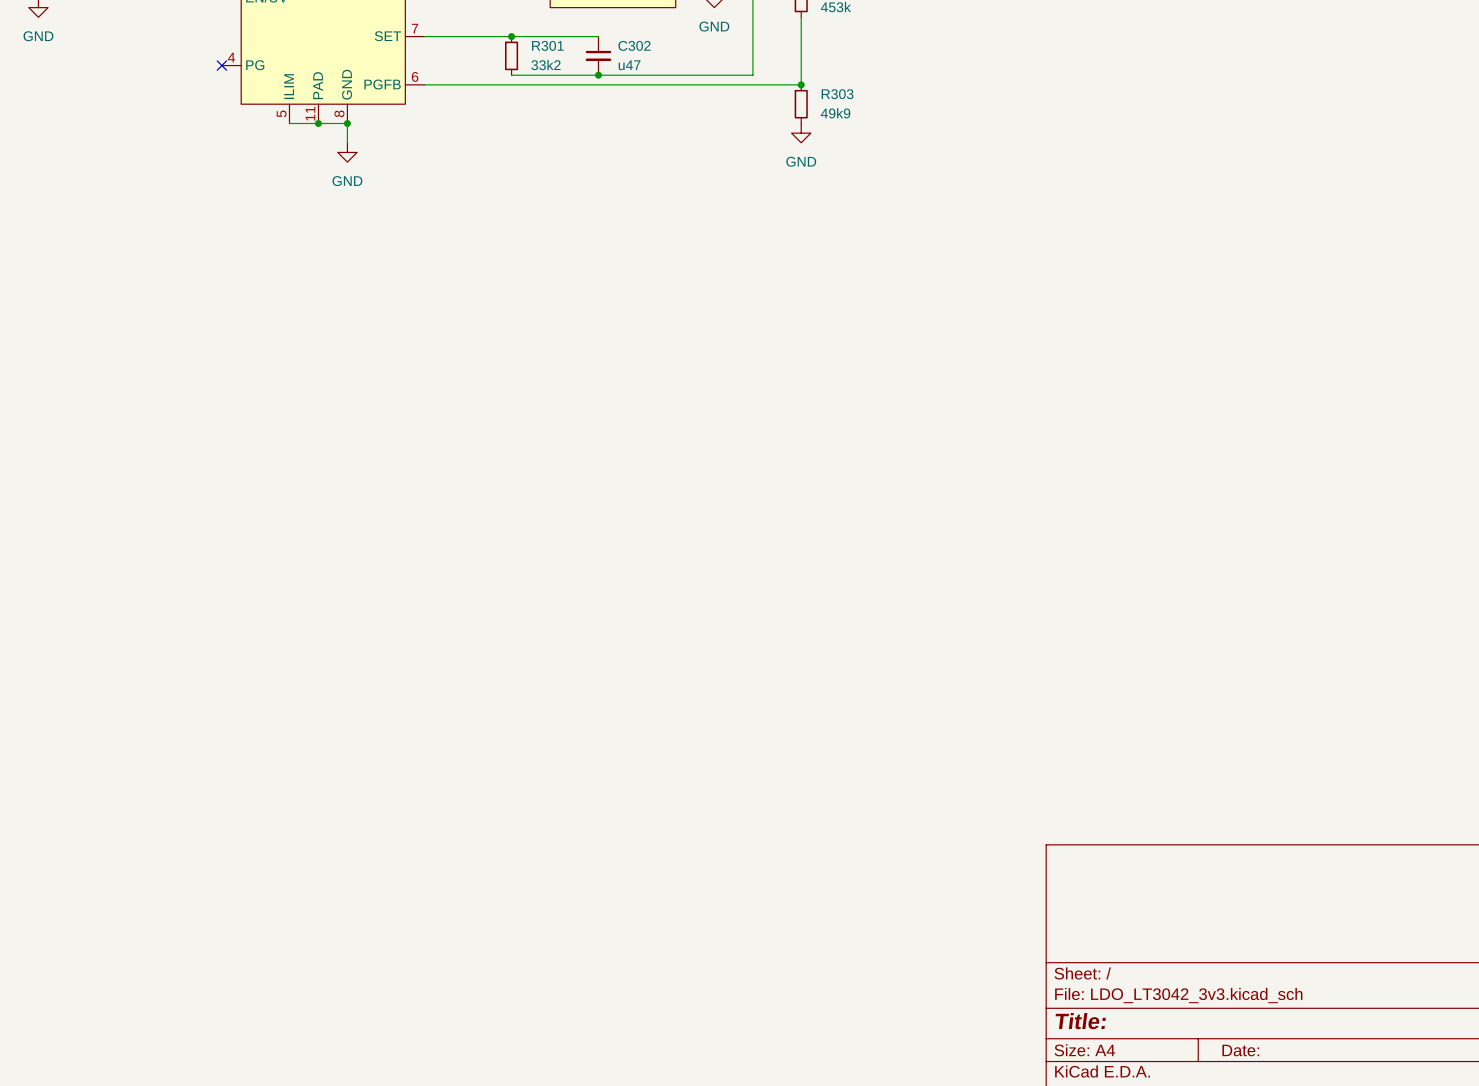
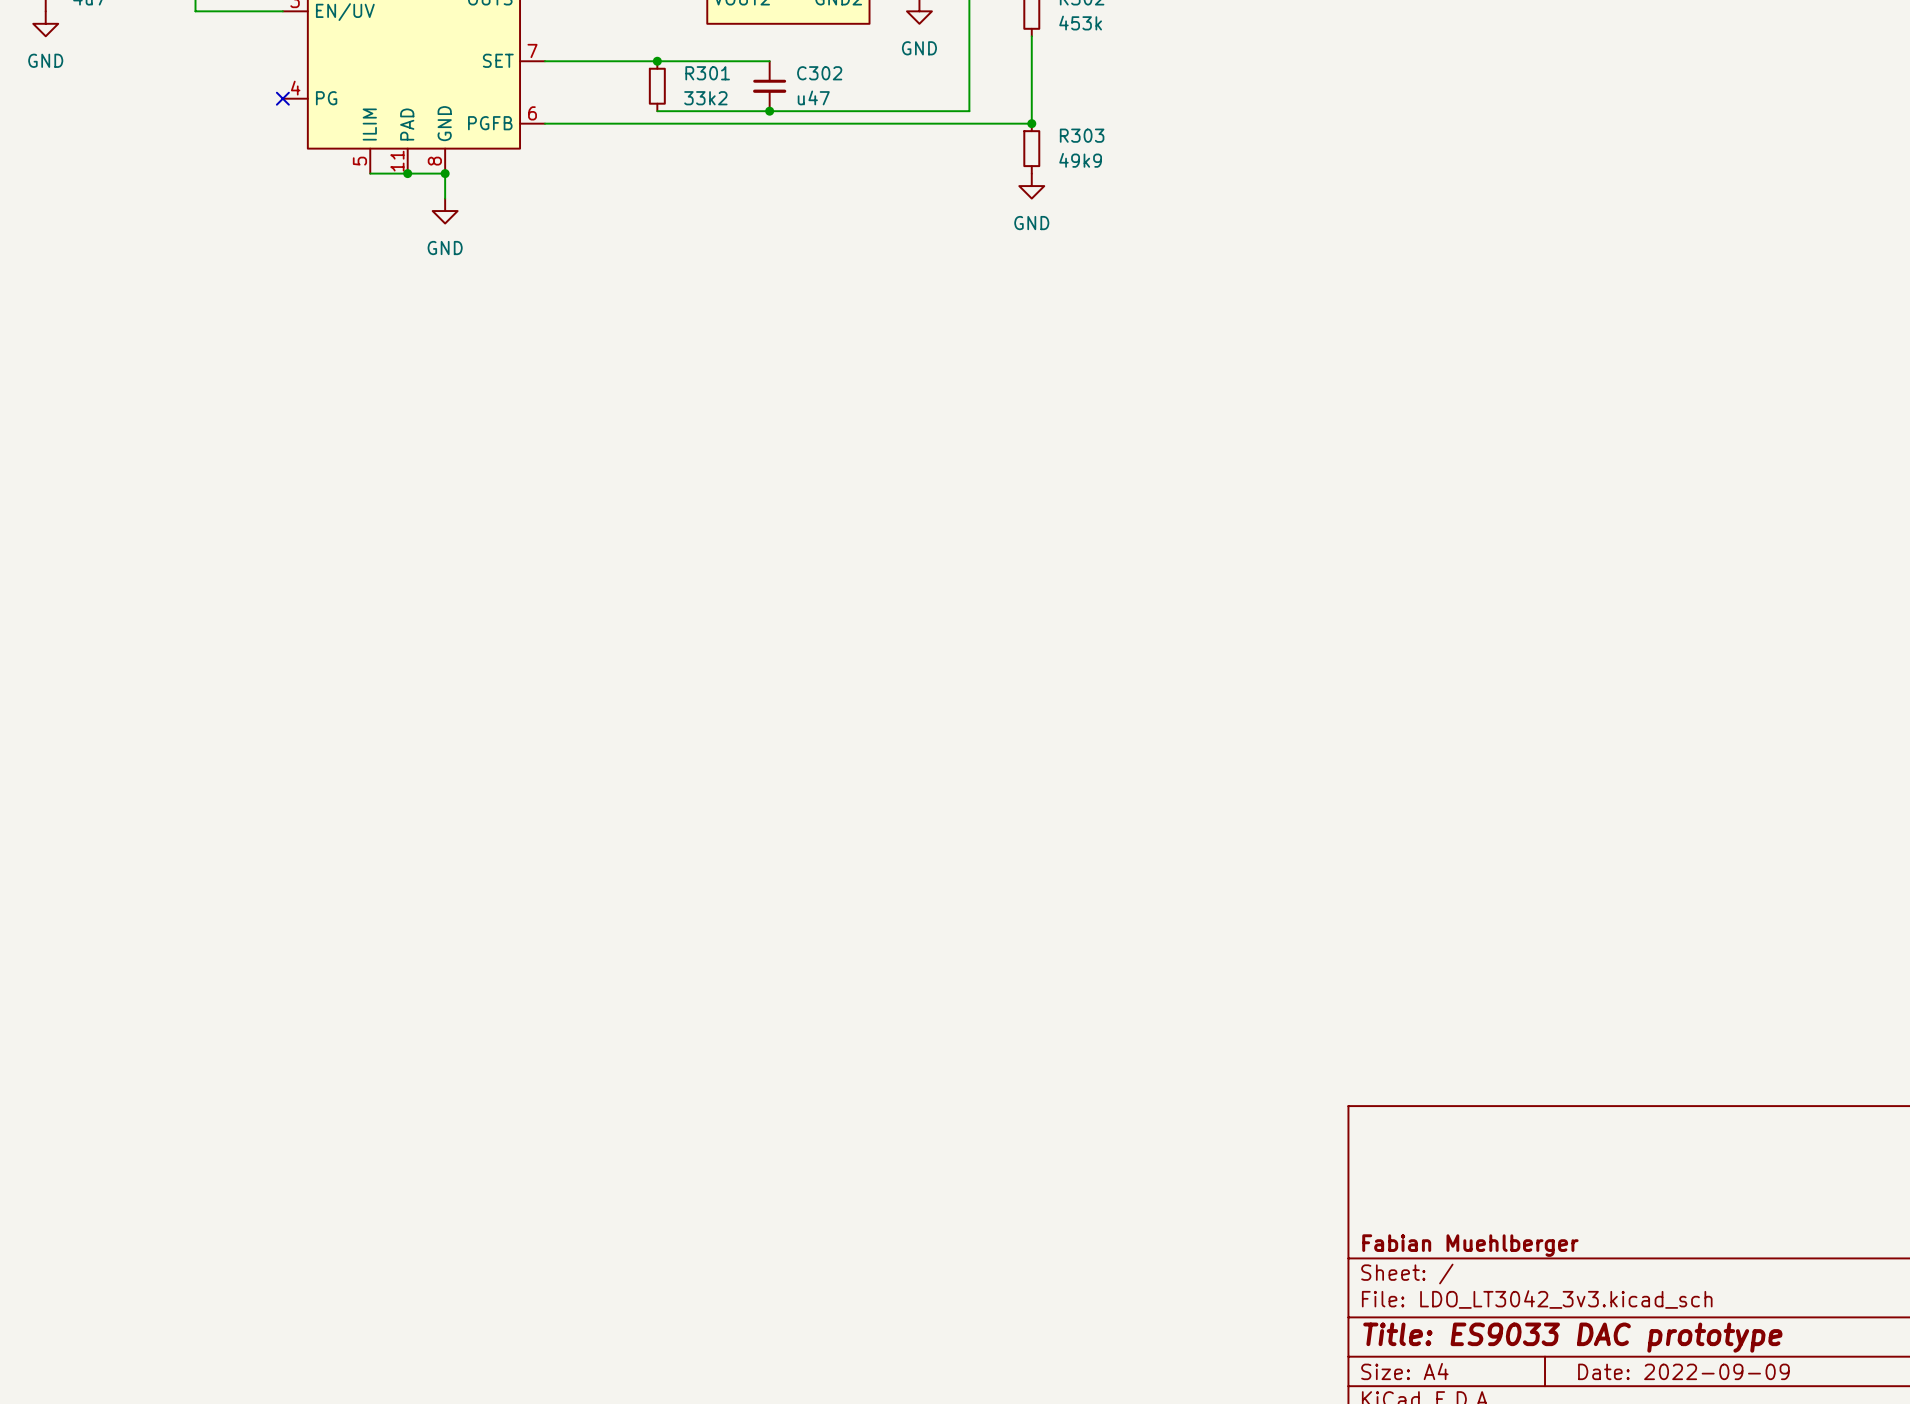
title block: none -> Fabian Muehlberger (1470, 1245)
title block: Title: (1080, 1021) -> Title: ES9033 DAC prototype (1572, 1337)
title block: Date: (1240, 1050) -> Date: 2022-09-09 (1683, 1371)

